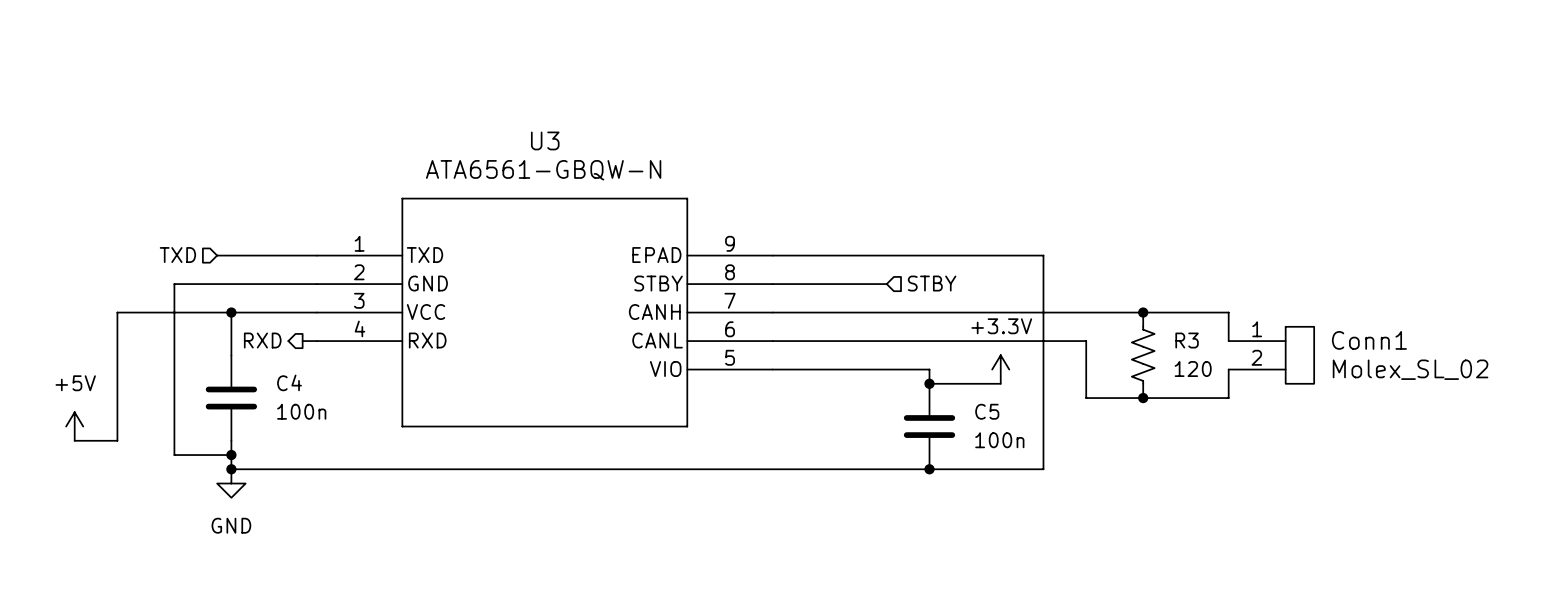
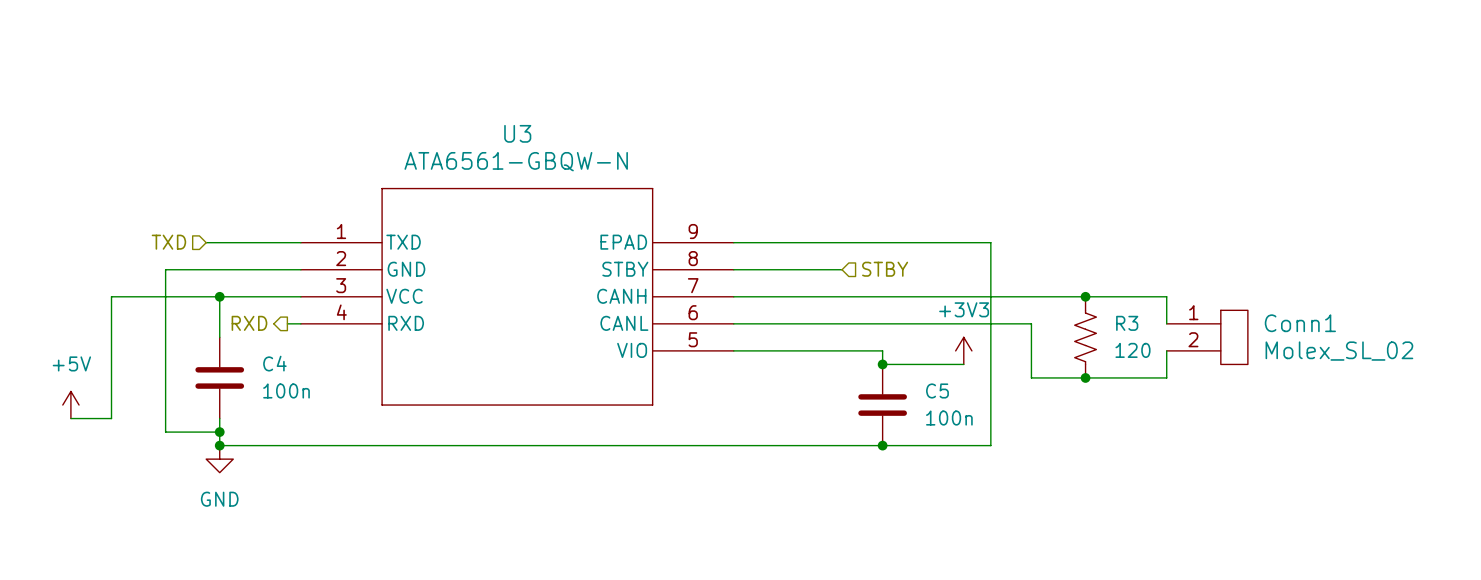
power symbol: +3.3V (1000, 369) -> none
power symbol: none -> +3V3 (963, 350)
wire: none -> (950, 364) (963, 364)

